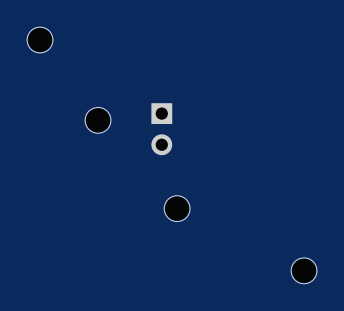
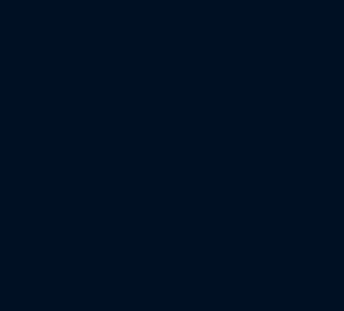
part: (40, 40) -> none
part: (98, 120) -> none
part: (161, 129) -> none
part: (177, 208) -> none
part: (304, 270) -> none

